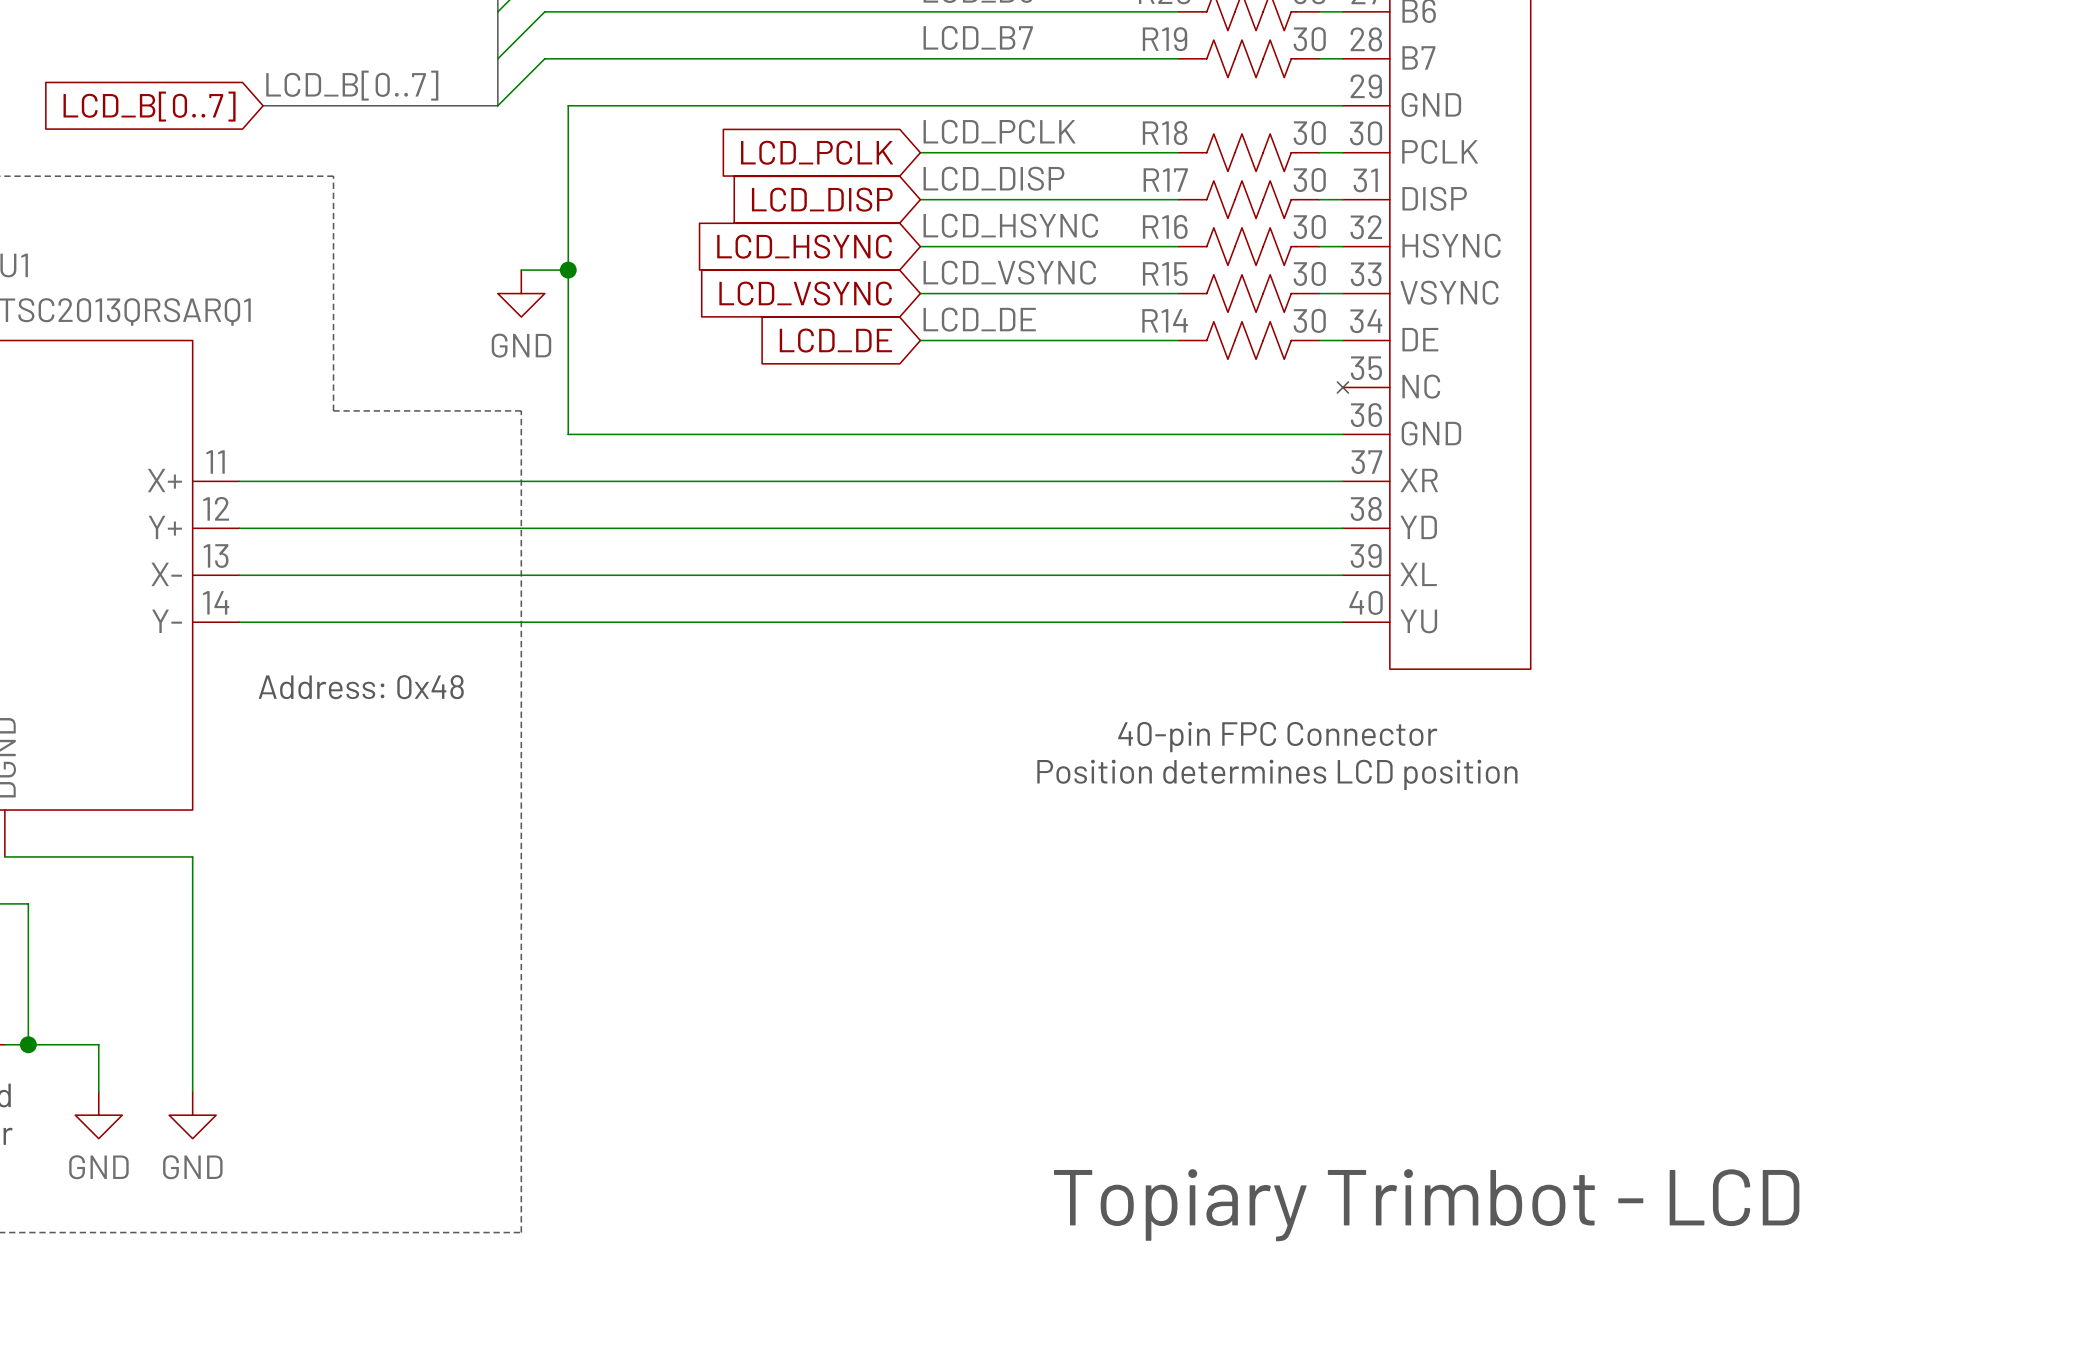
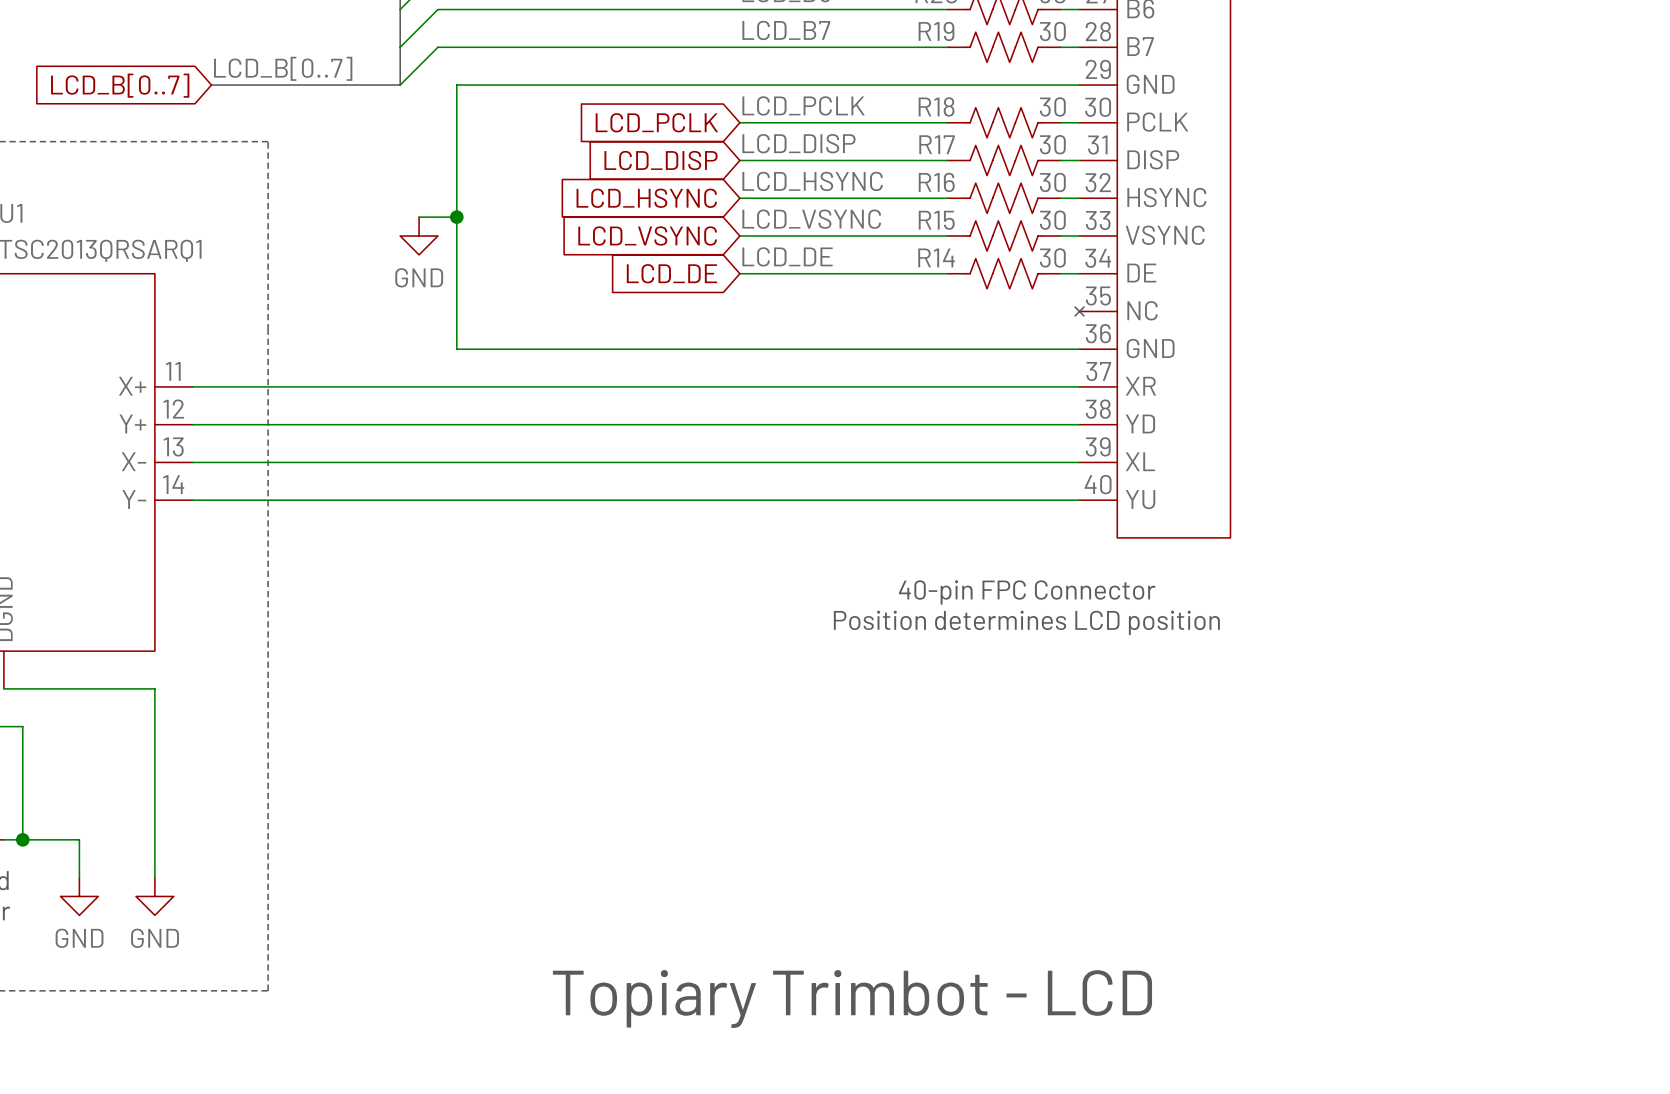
line: (333, 410) (521, 410) (521, 1232) (333, 1232) -> (268, 330) (268, 990)
text: Address: 0x48 (361, 687) -> none
text position: Topiary Trimbot - LCD (1426, 1205) -> Topiary Trimbot - LCD (852, 999)

